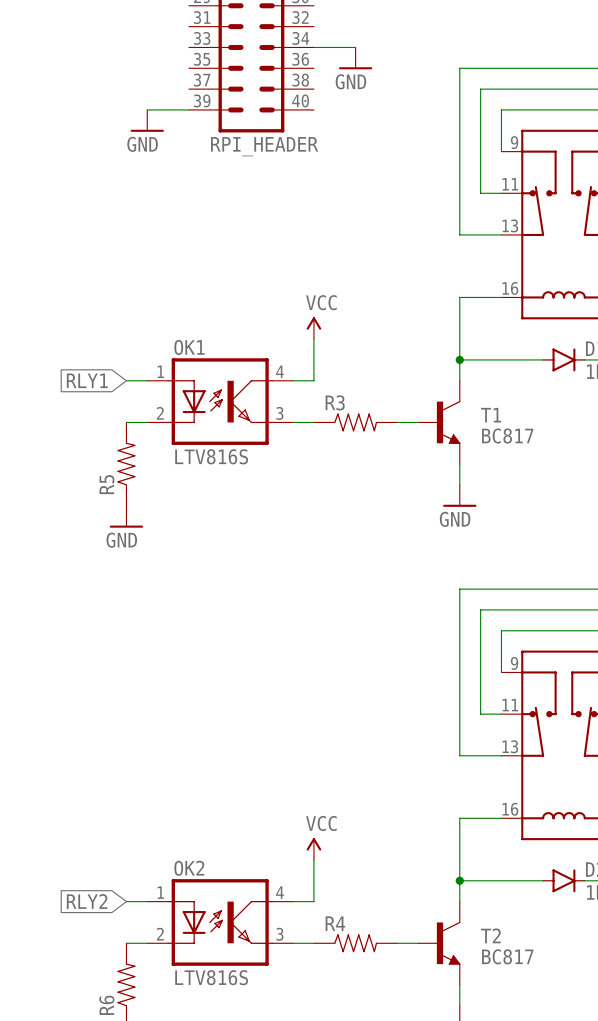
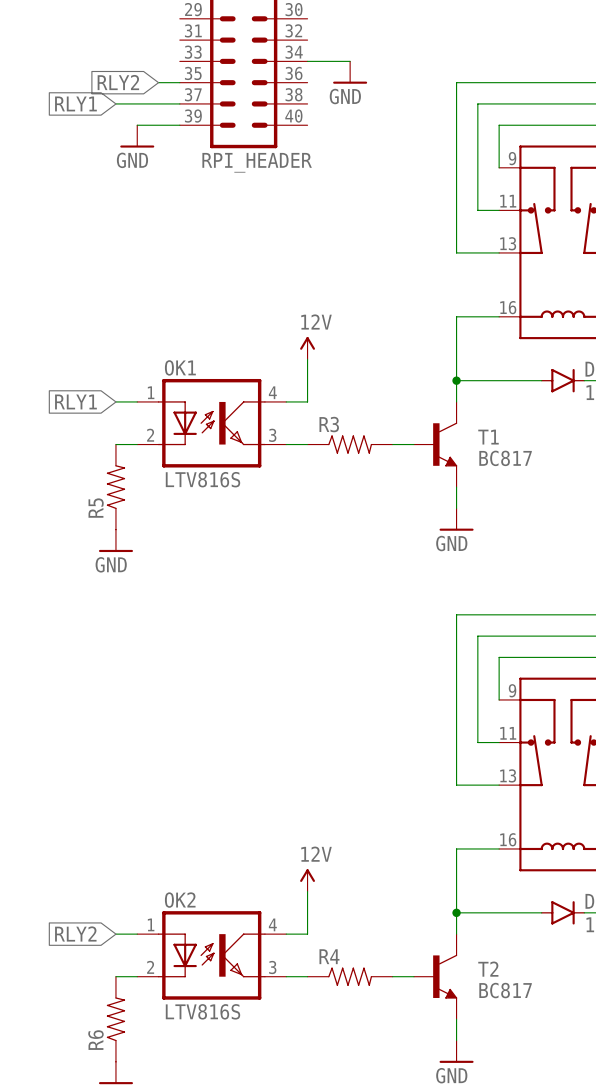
global label: none -> RLY2 (118, 82)
wire: none -> (158, 82) (179, 82)
global label: none -> RLY1 (75, 103)
wire: none -> (115, 103) (179, 103)
power symbol: VCC (313, 328) -> 12V (307, 348)
power symbol: VCC (313, 849) -> 12V (307, 880)

